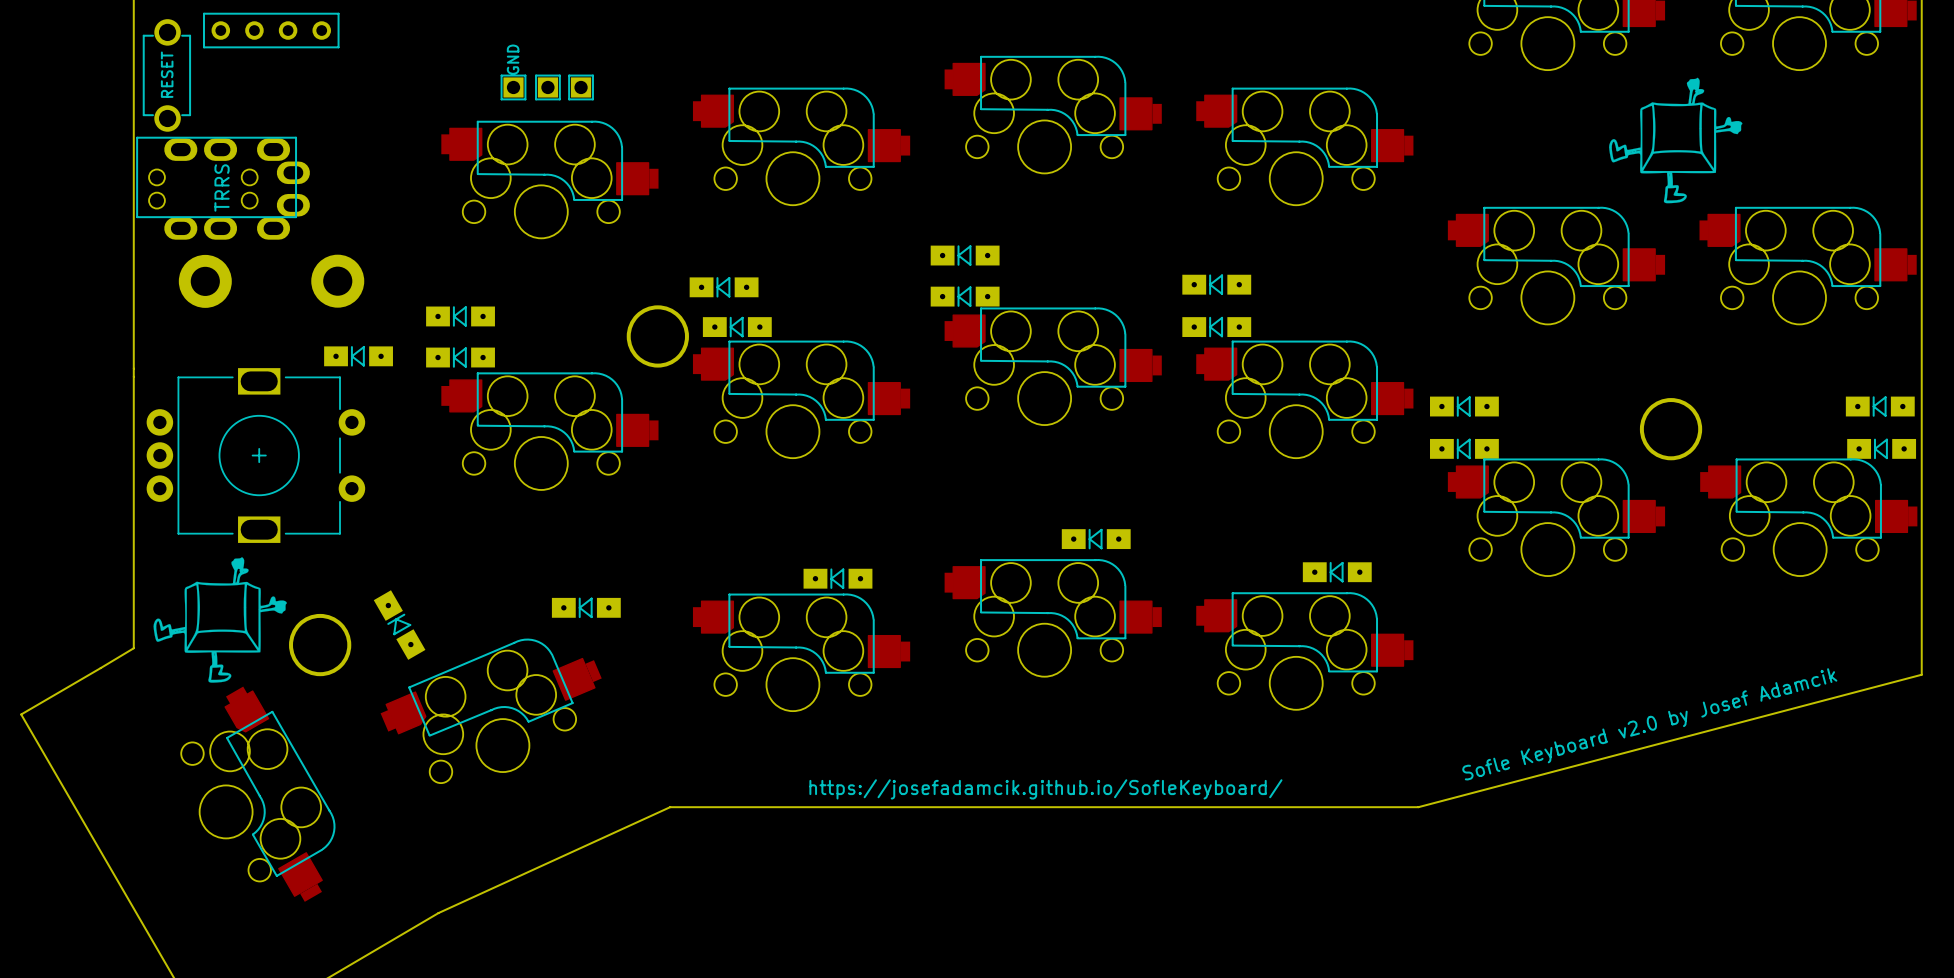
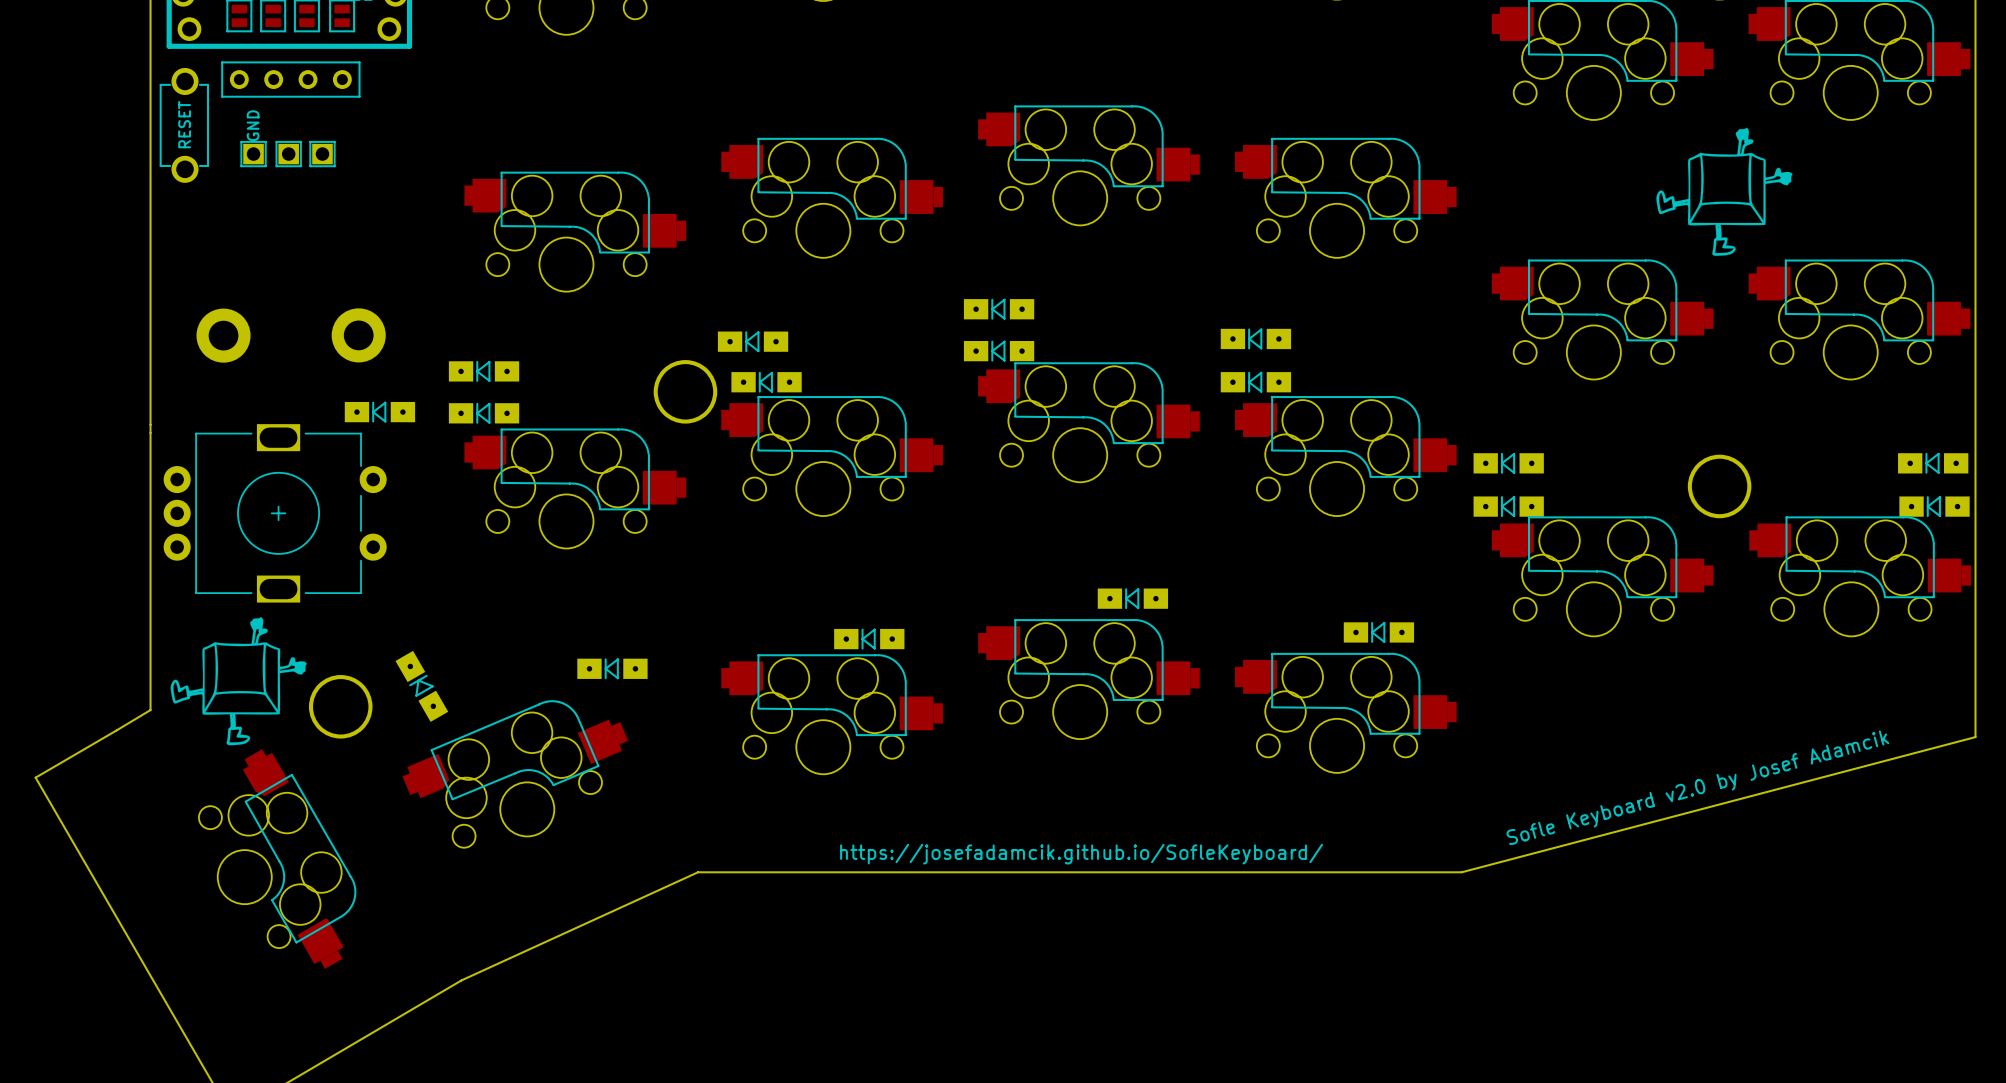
part position: (547, 87) -> (288, 154)
part: (223, 188) -> none

